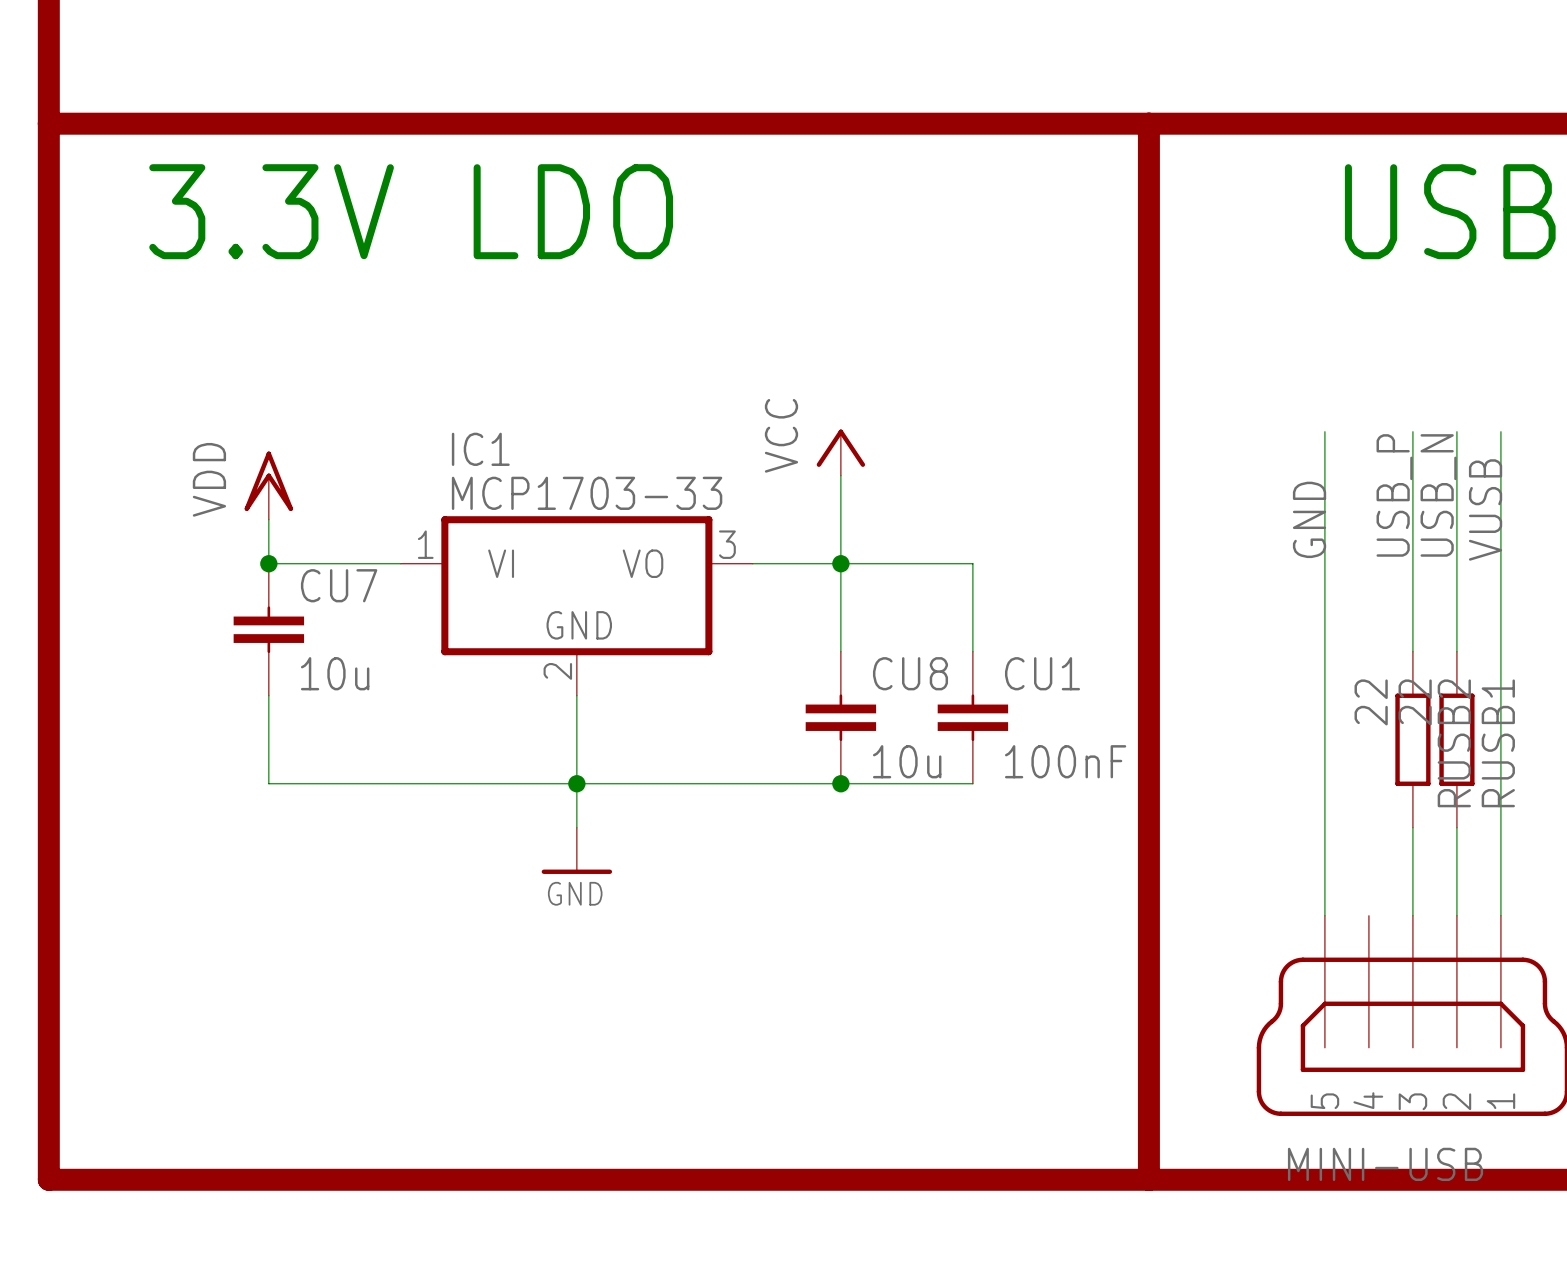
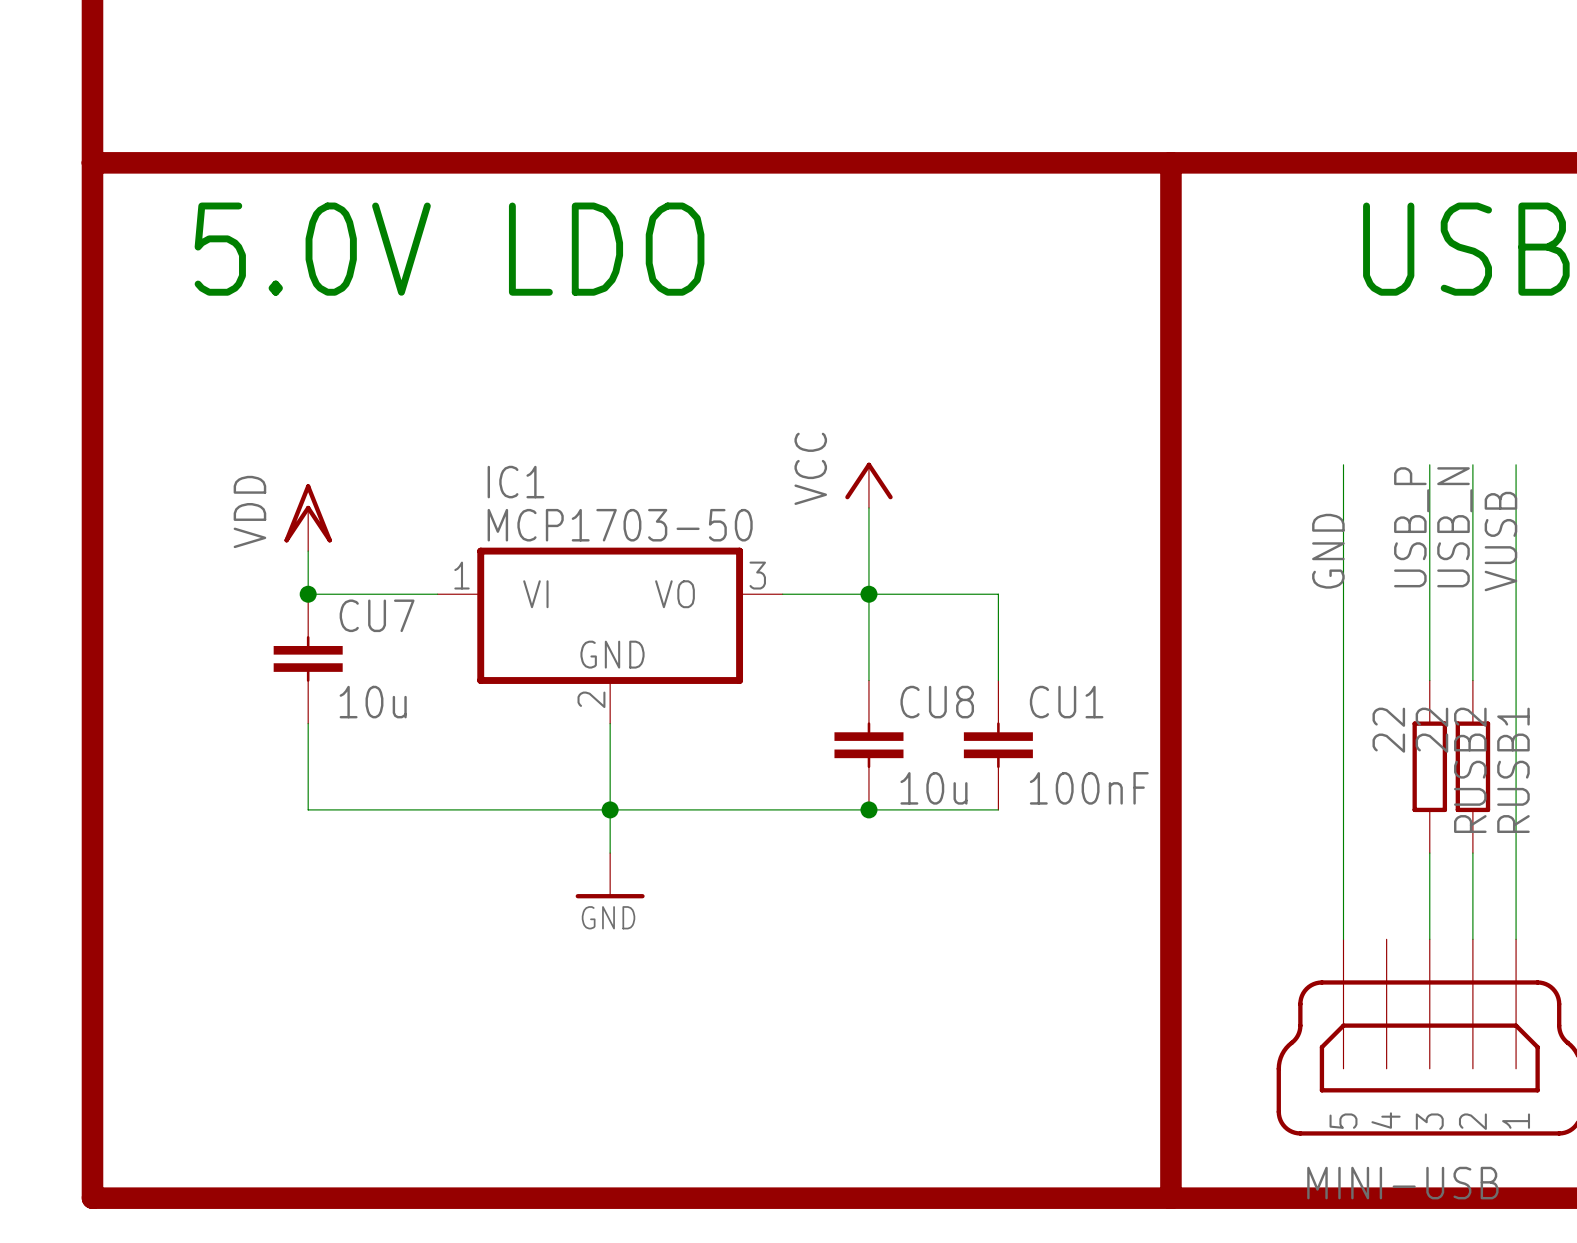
text: 3.3V LDO (411, 211) -> 5.0V LDO (449, 249)
IC1 value: MCP1703-33 (587, 493) -> MCP1703-50 (620, 525)

